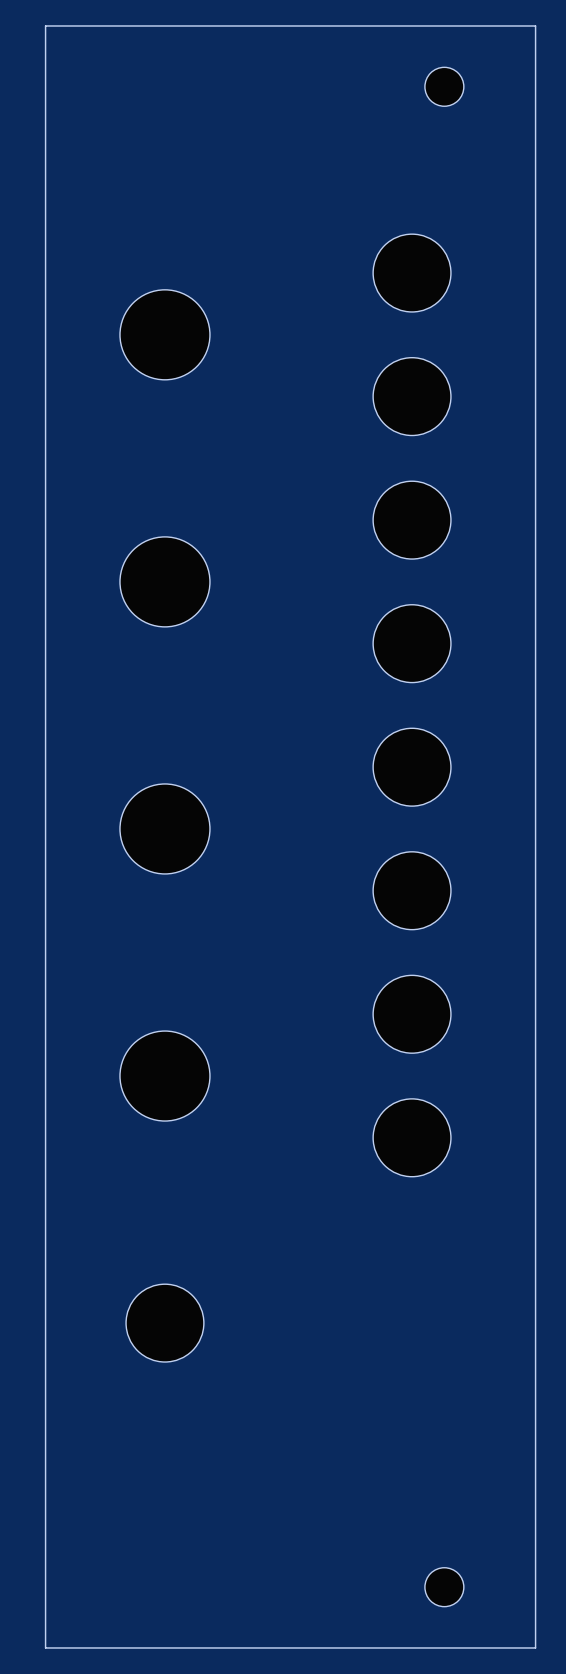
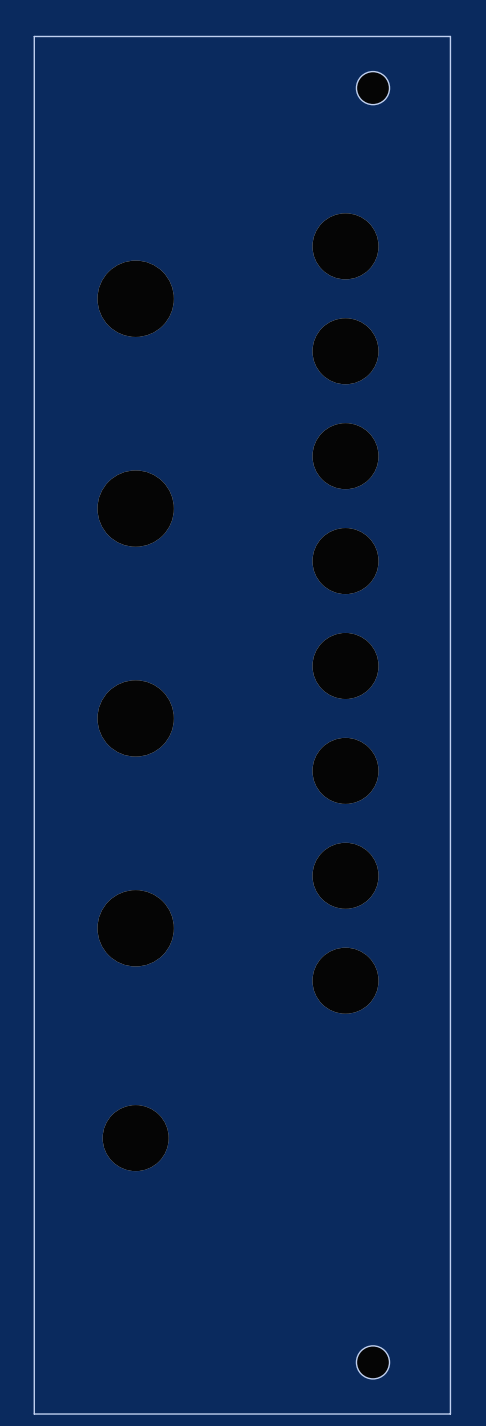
part footprint: [373, 234, 451, 312] -> [312, 213, 379, 280]
part footprint: [119, 289, 210, 380] -> [97, 260, 174, 337]
part footprint: [373, 357, 451, 436] -> [312, 318, 379, 385]
part footprint: [373, 481, 451, 560] -> [312, 423, 379, 490]
part footprint: [119, 536, 210, 627] -> [97, 470, 174, 547]
part footprint: [373, 604, 451, 683] -> [312, 528, 379, 595]
part footprint: [373, 728, 451, 807] -> [312, 632, 379, 700]
part footprint: [119, 783, 210, 874] -> [97, 680, 174, 757]
part footprint: [373, 851, 451, 930] -> [312, 737, 379, 804]
part footprint: [373, 975, 451, 1054] -> [312, 842, 379, 909]
part footprint: [119, 1031, 210, 1122] -> [97, 890, 174, 967]
part footprint: [373, 1098, 451, 1177] -> [312, 947, 379, 1014]
part footprint: [126, 1284, 204, 1363] -> [102, 1105, 169, 1172]

